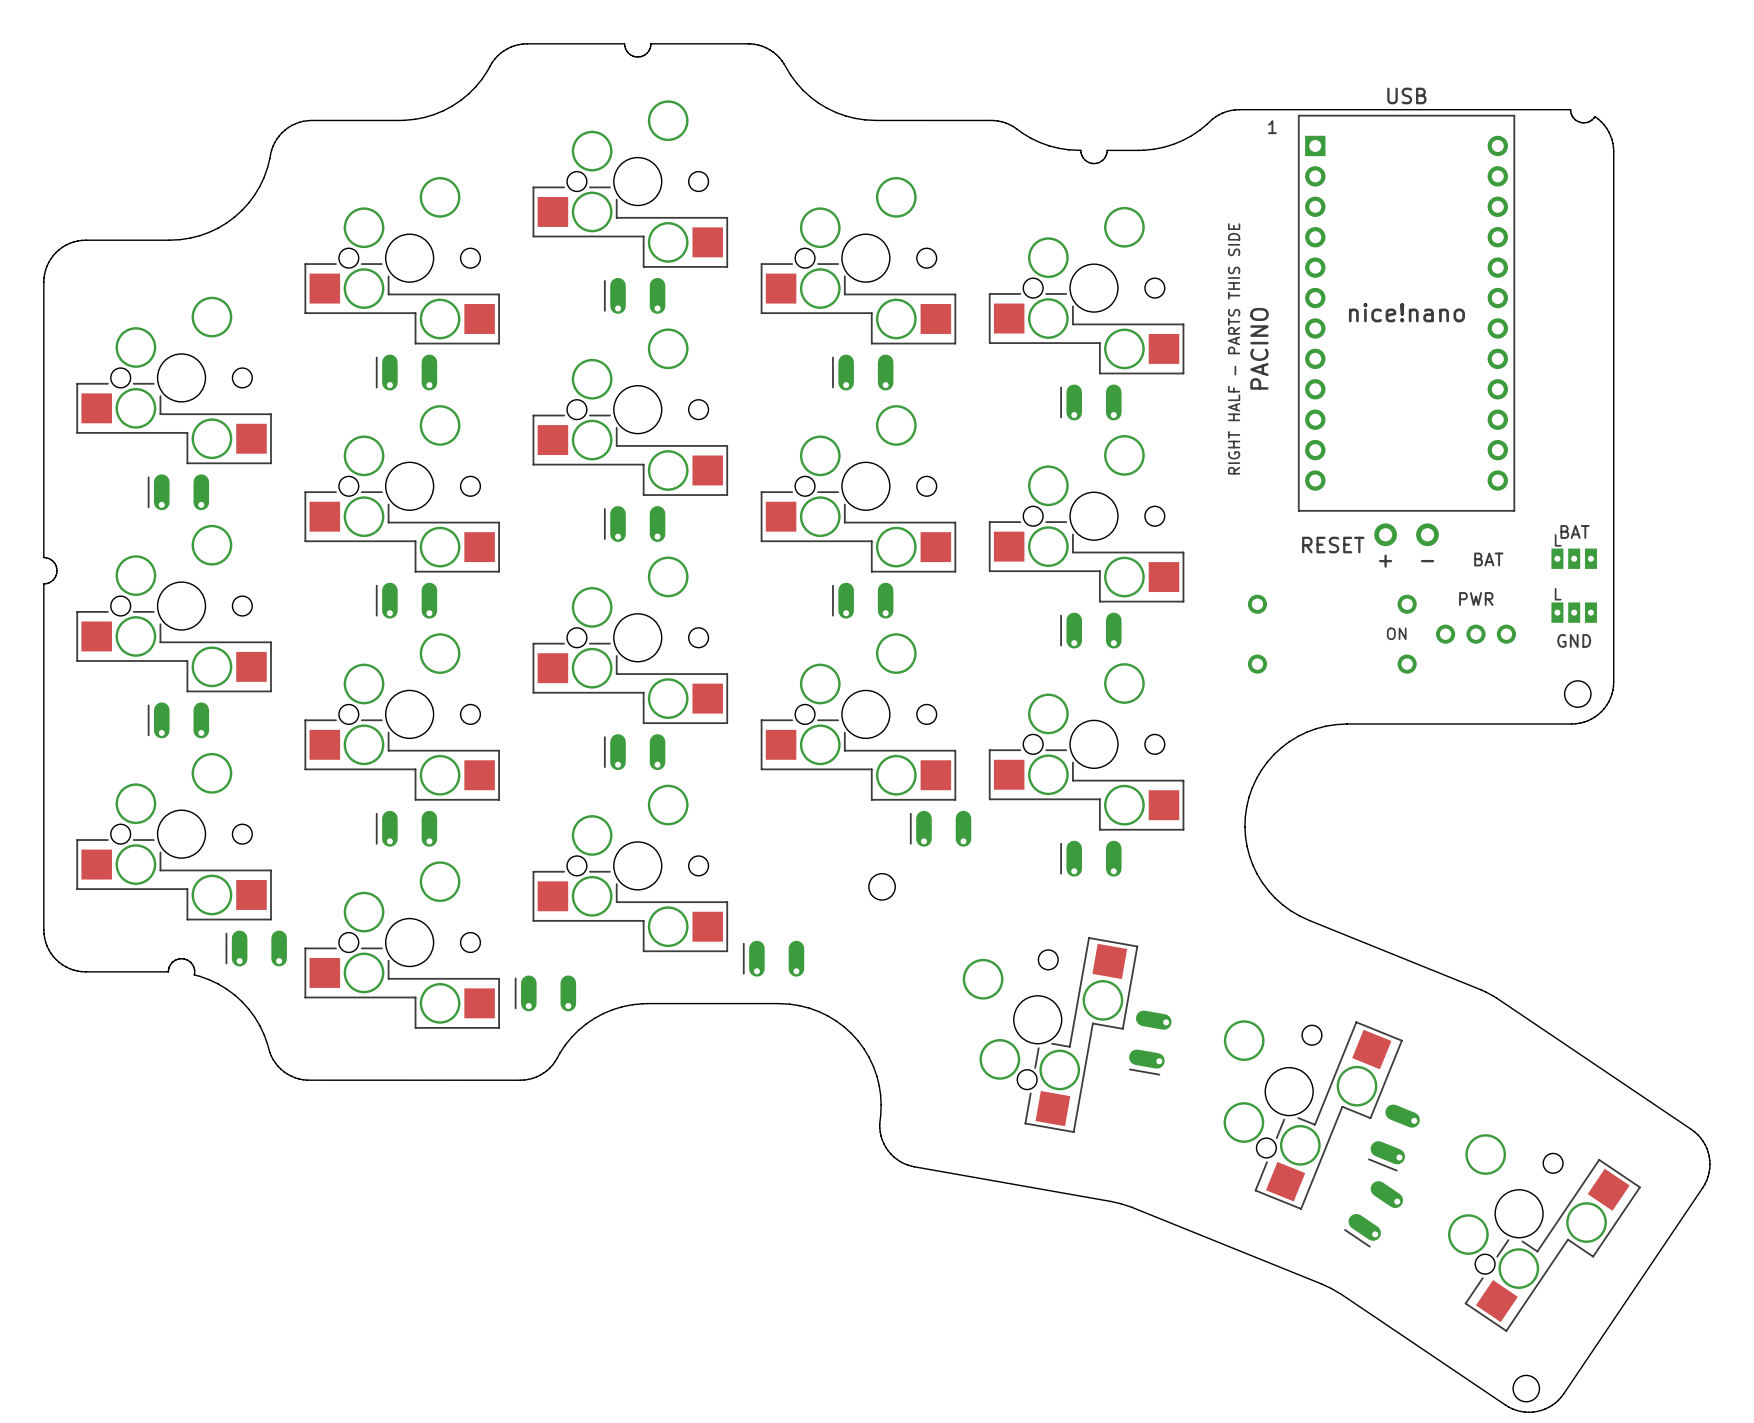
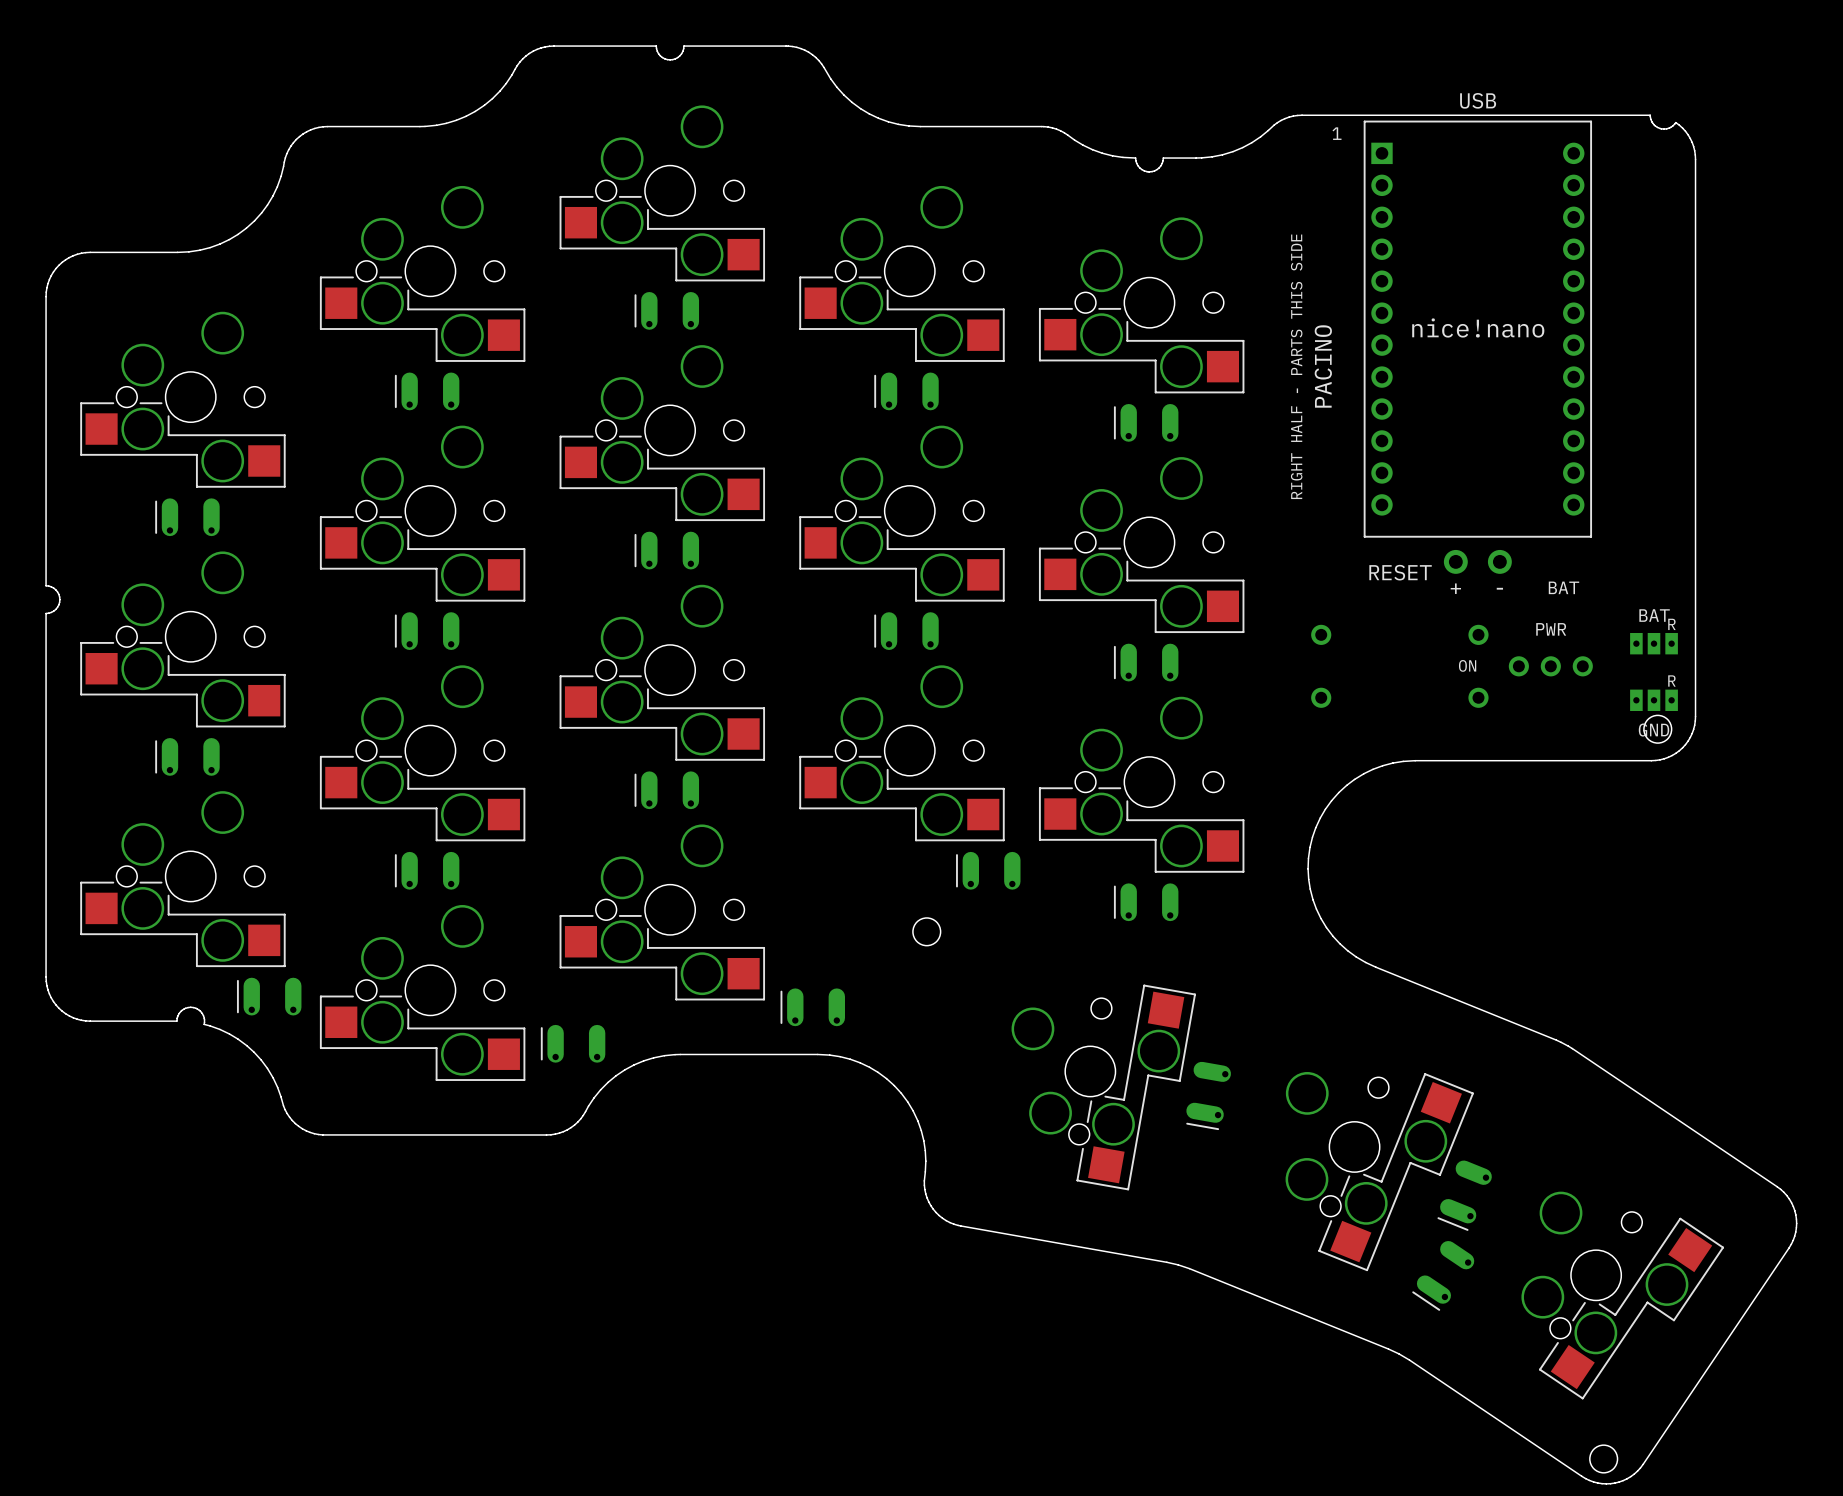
text position: BAT (1575, 531) -> BAT (1654, 615)
text: L (1558, 540) -> none
part position: (1574, 558) -> (1654, 700)
text: L (1558, 594) -> none
text: none -> R (1671, 624)
text position: GND (1574, 640) -> GND (1654, 730)
text: none -> R (1671, 681)

